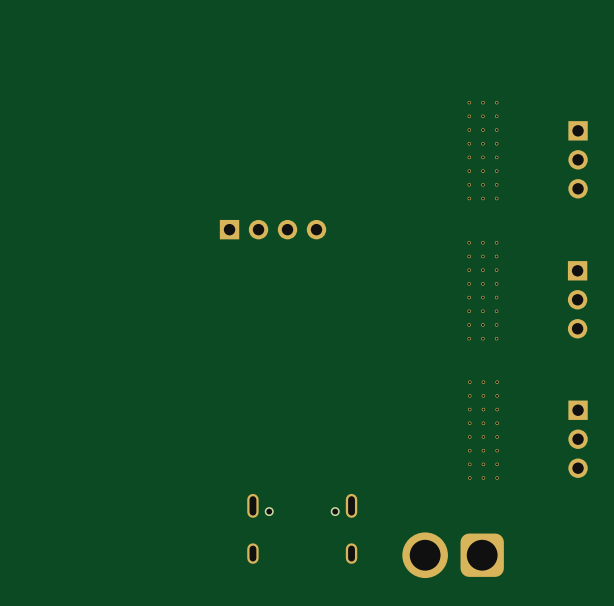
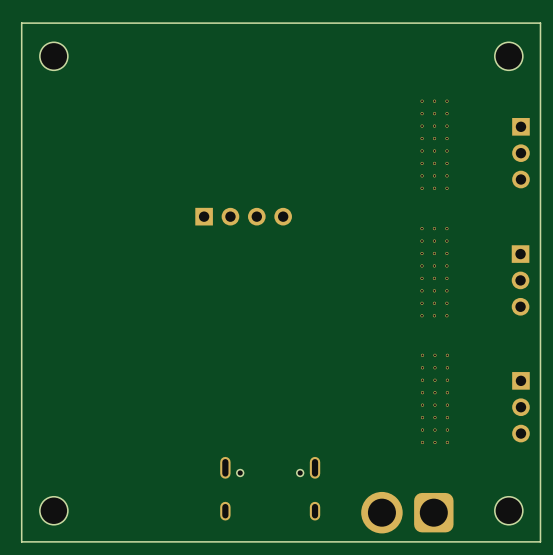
board edge: none -> (540, 23) (21, 23) (21, 541) (540, 541) (540, 23)
part: none -> (53, 56)
part: none -> (508, 56)
part: none -> (53, 510)
part: none -> (508, 510)

